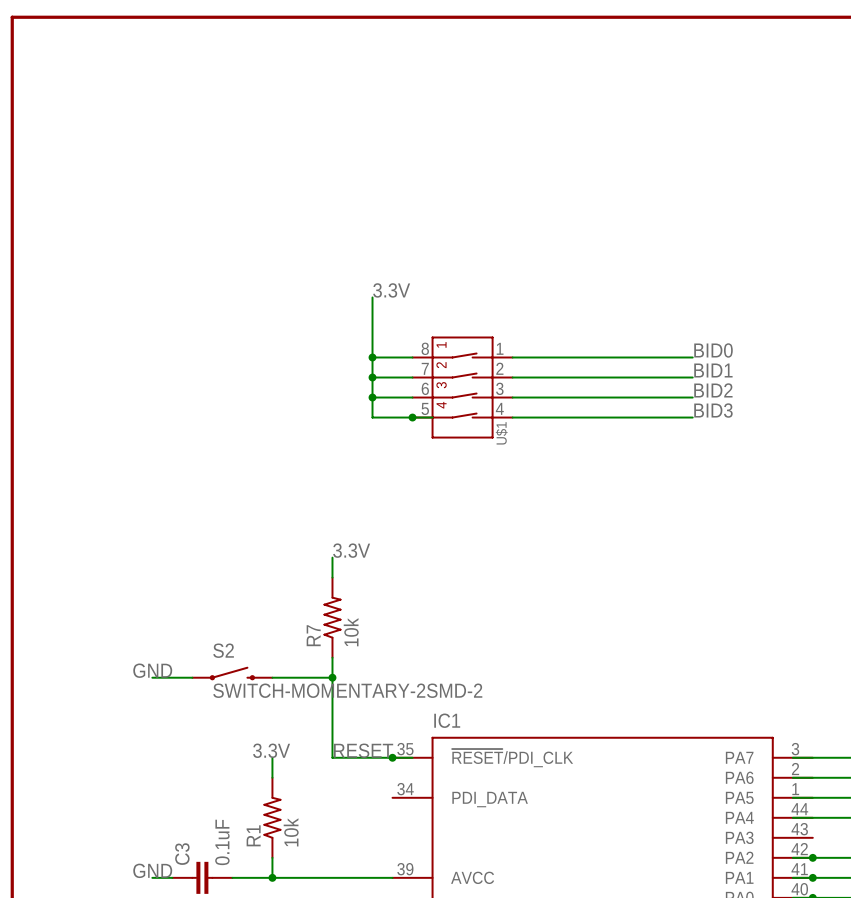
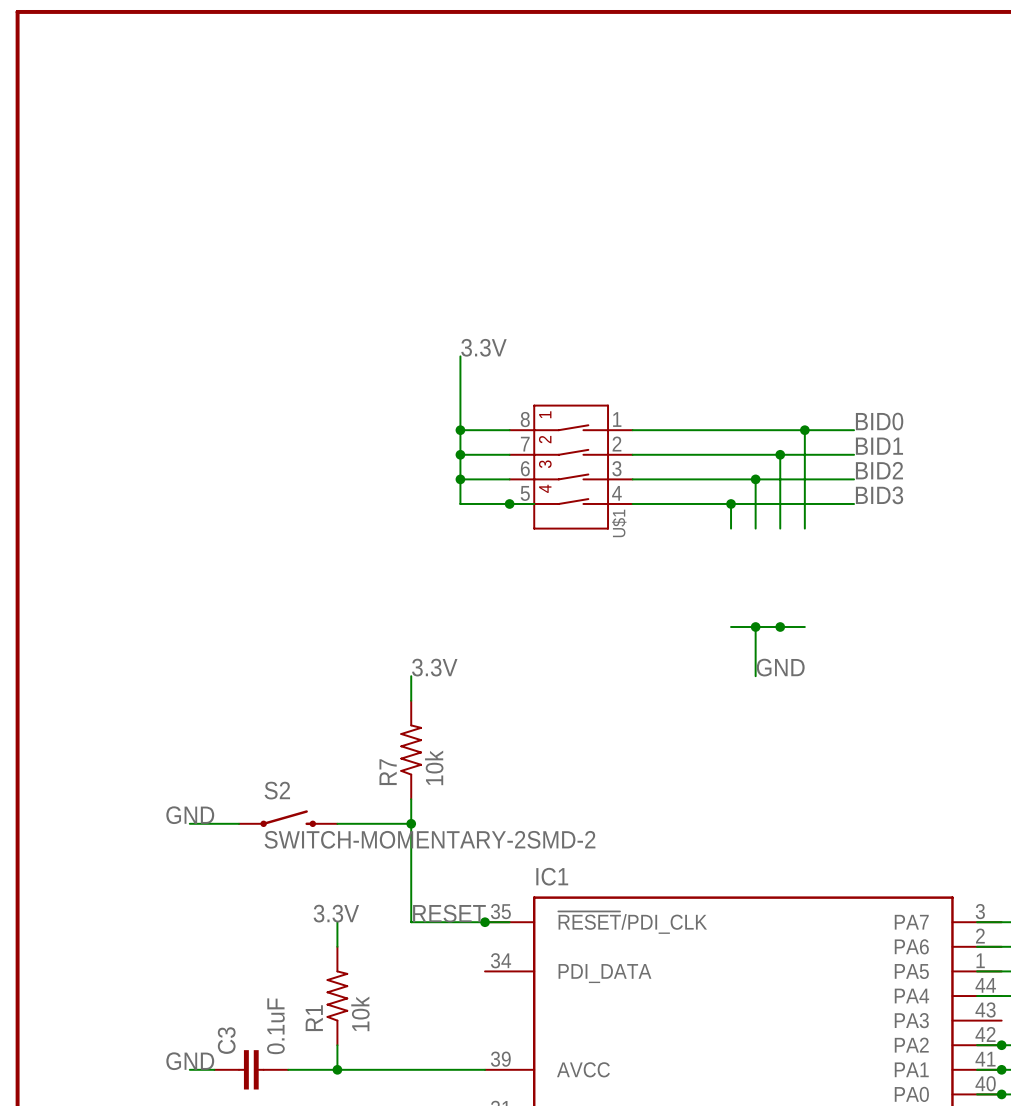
wire: none -> (804, 430) (804, 528)
junction: none -> (804, 430)
wire: none -> (780, 454) (780, 528)
junction: none -> (780, 454)
wire: none -> (755, 479) (755, 528)
junction: none -> (755, 479)
wire: none -> (731, 503) (731, 528)
junction: none -> (731, 503)
wire: none -> (731, 627) (804, 627)
wire: none -> (755, 627) (755, 676)
junction: none -> (755, 627)
junction: none -> (780, 627)
label: none -> GND (780, 667)

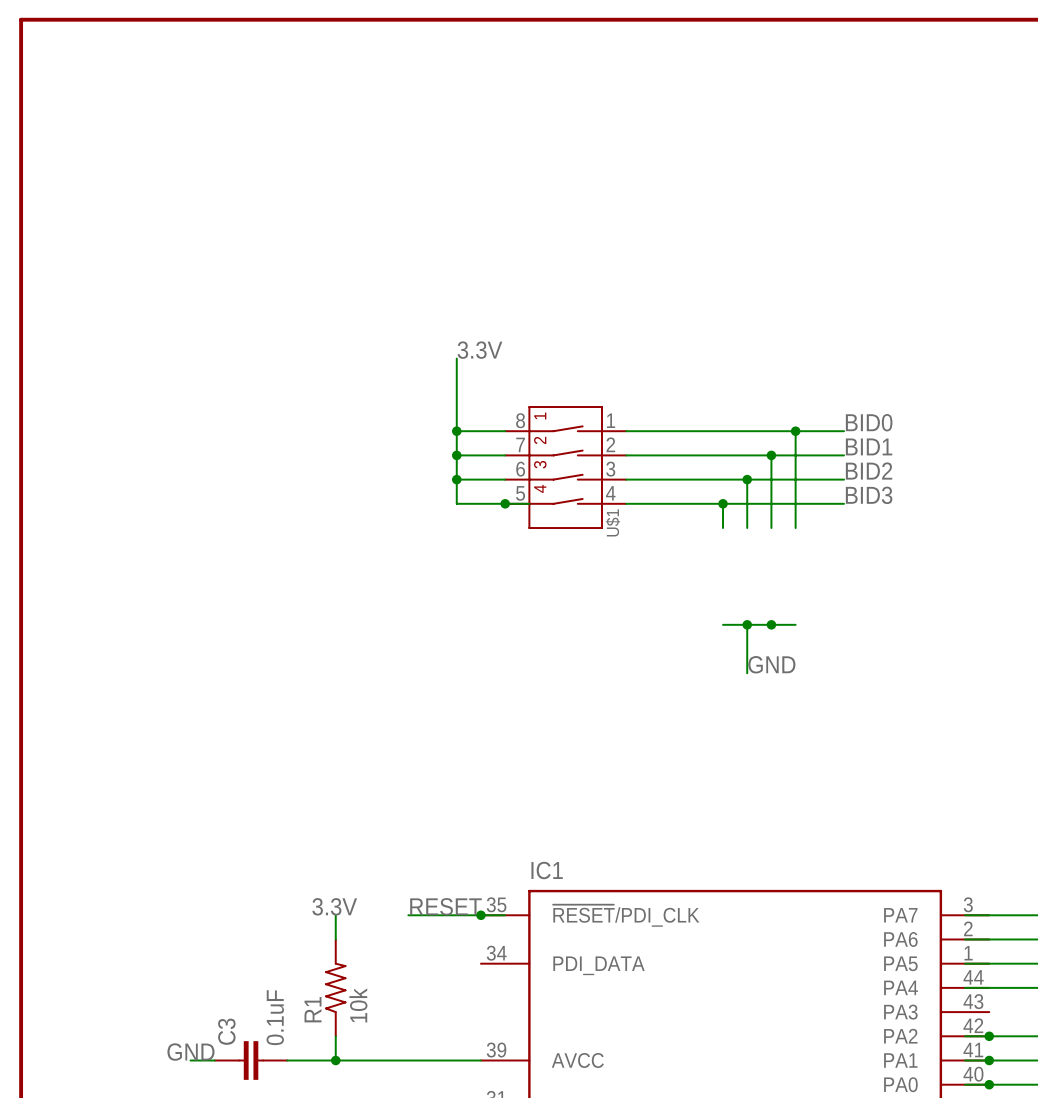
label: 3.3V (434, 667) -> none
wire: (411, 676) (411, 700) -> none
R7: 10k (411, 750) -> none
wire: (411, 799) (411, 922) -> none
label: GND (190, 815) -> none
S2: SWITCH-MOMENTARY-2SMD-2 (288, 818) -> none
wire: (189, 823) (239, 823) -> none
wire: (337, 823) (411, 823) -> none
junction: (411, 823) -> none

